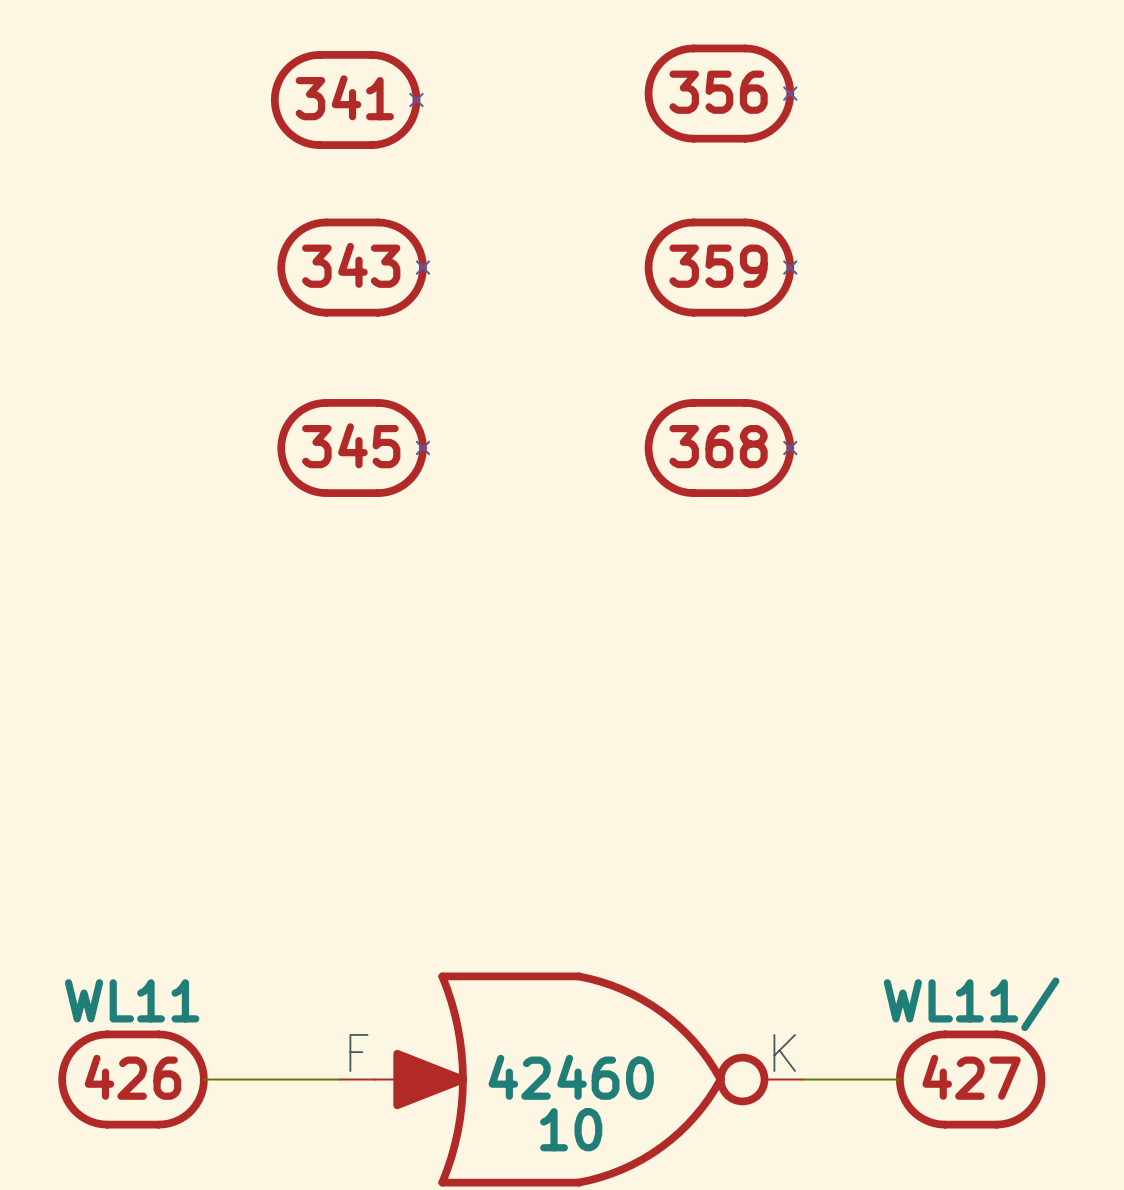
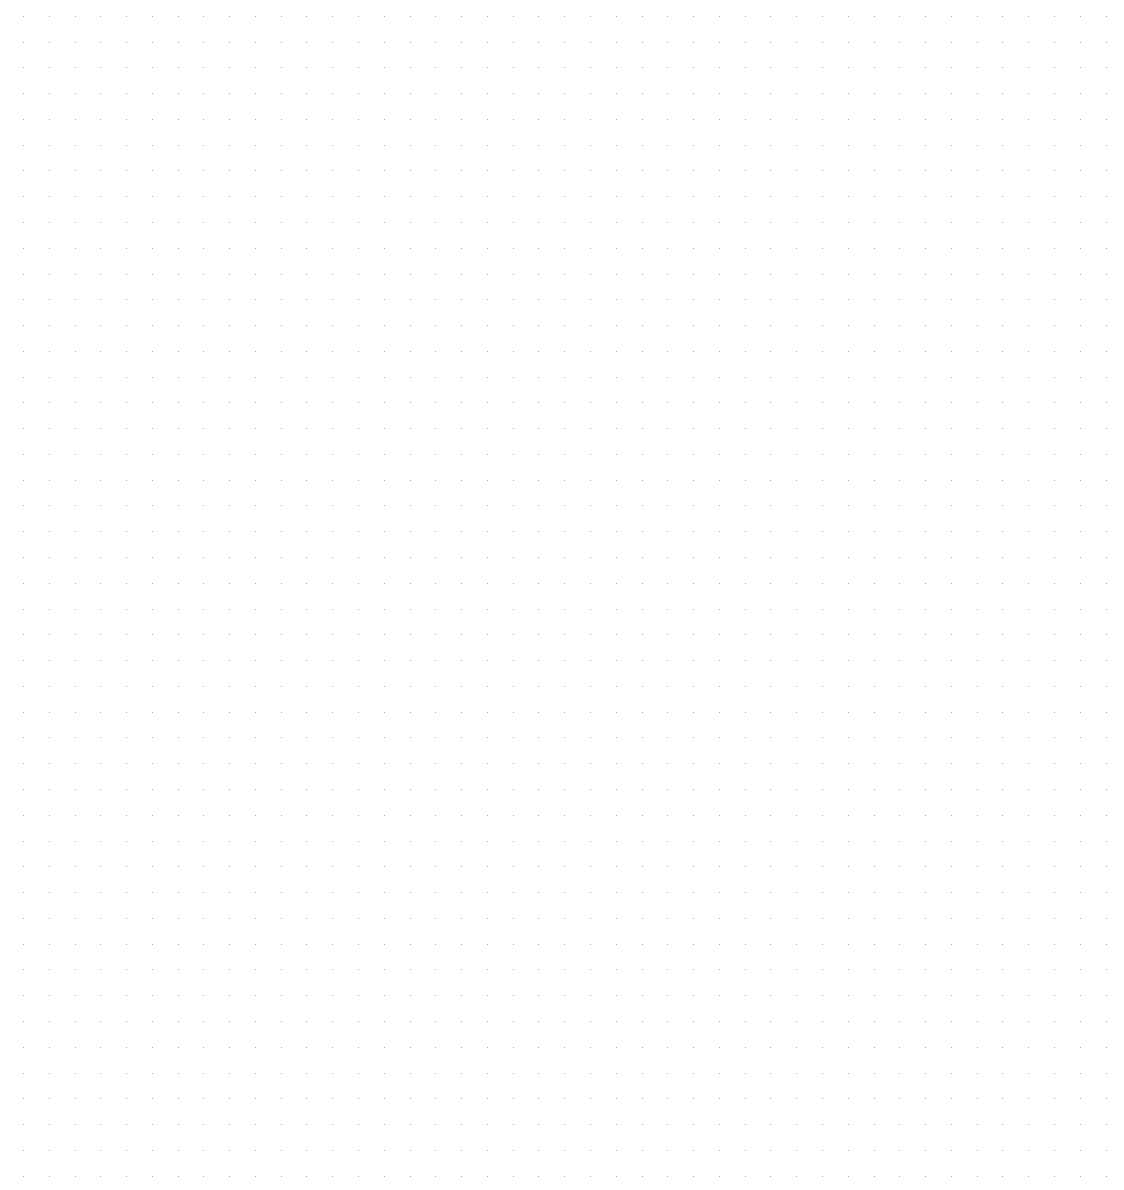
part: (719, 93) -> none
no-connect mark: (790, 93) -> none
part: (345, 100) -> none
no-connect mark: (416, 100) -> none
part: (352, 267) -> none
no-connect mark: (422, 267) -> none
part: (719, 267) -> none
no-connect mark: (790, 267) -> none
part: (352, 447) -> none
no-connect mark: (422, 447) -> none
part: (719, 447) -> none
no-connect mark: (790, 447) -> none
part: (133, 1079) -> none
wire: (203, 1079) (339, 1079) -> none
part: (571, 1079) -> none
wire: (803, 1079) (899, 1079) -> none
part: (970, 1079) -> none

